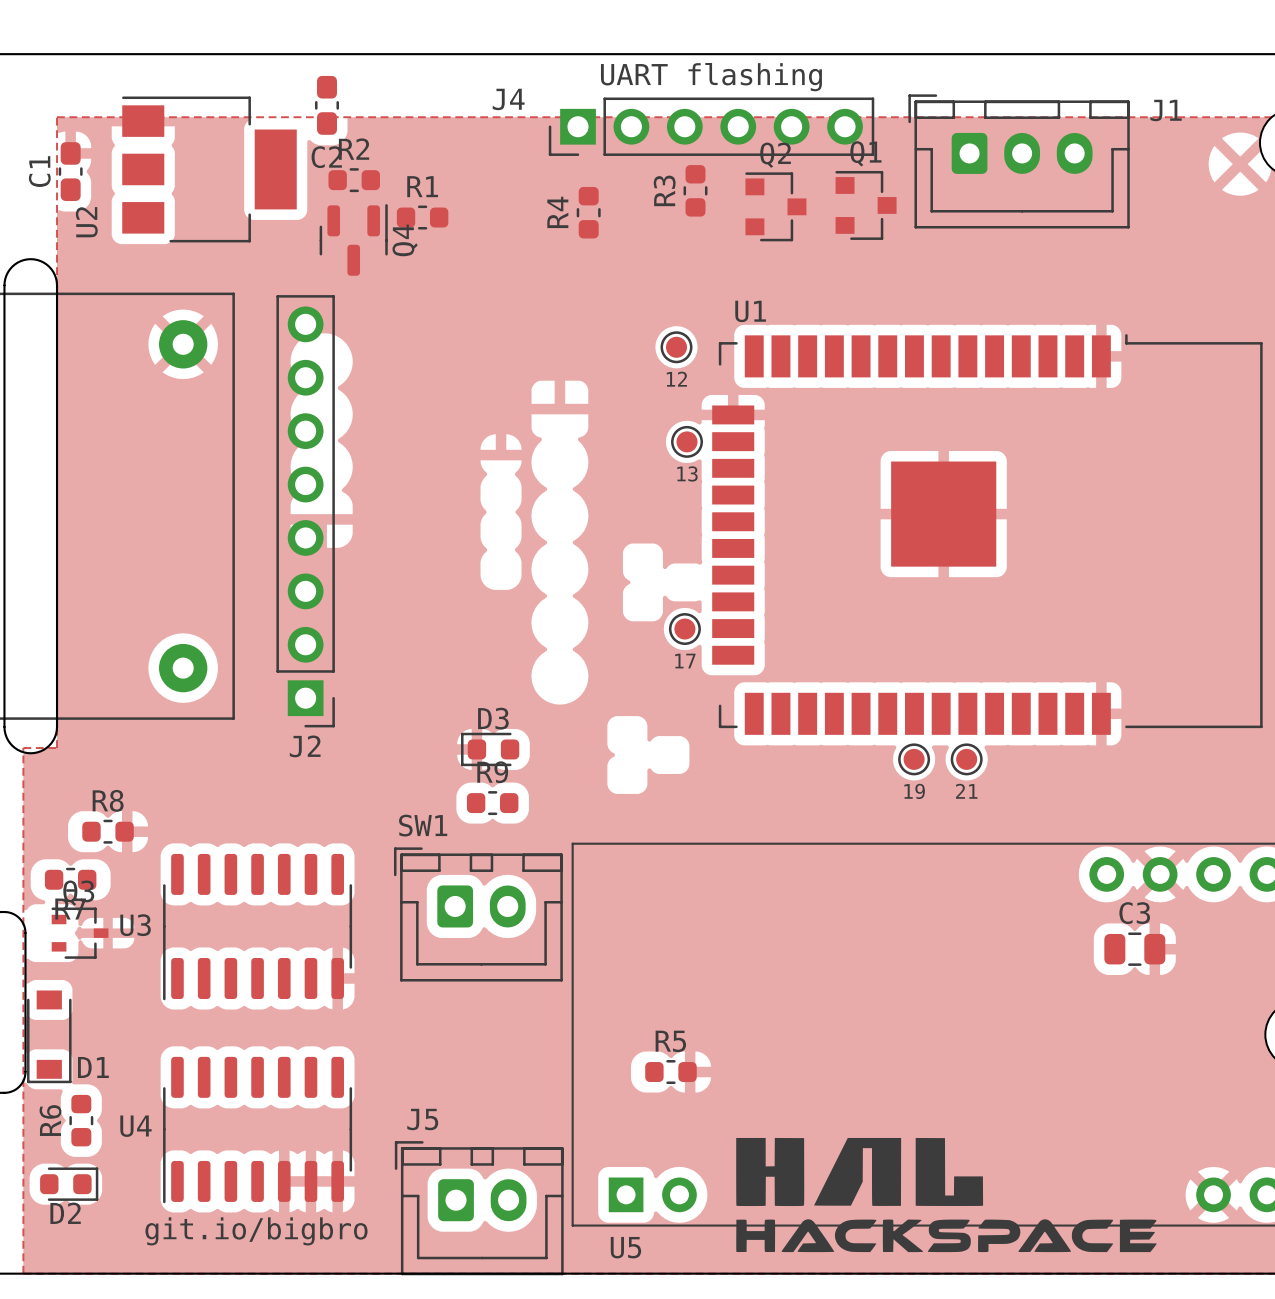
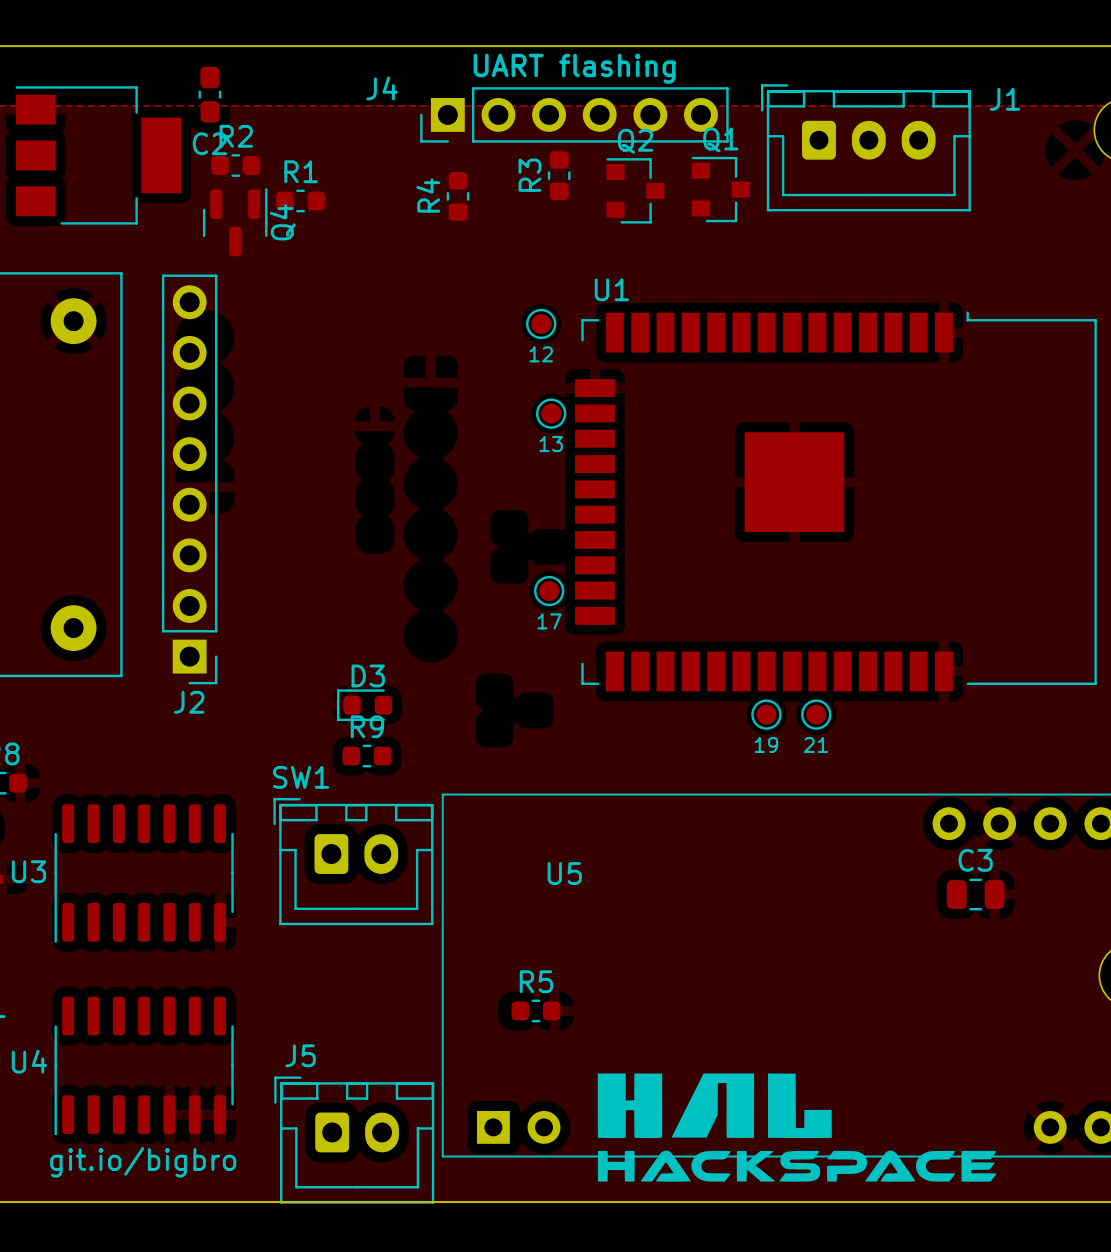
U5 name position: U5 (625, 1247) -> U5 (564, 873)

